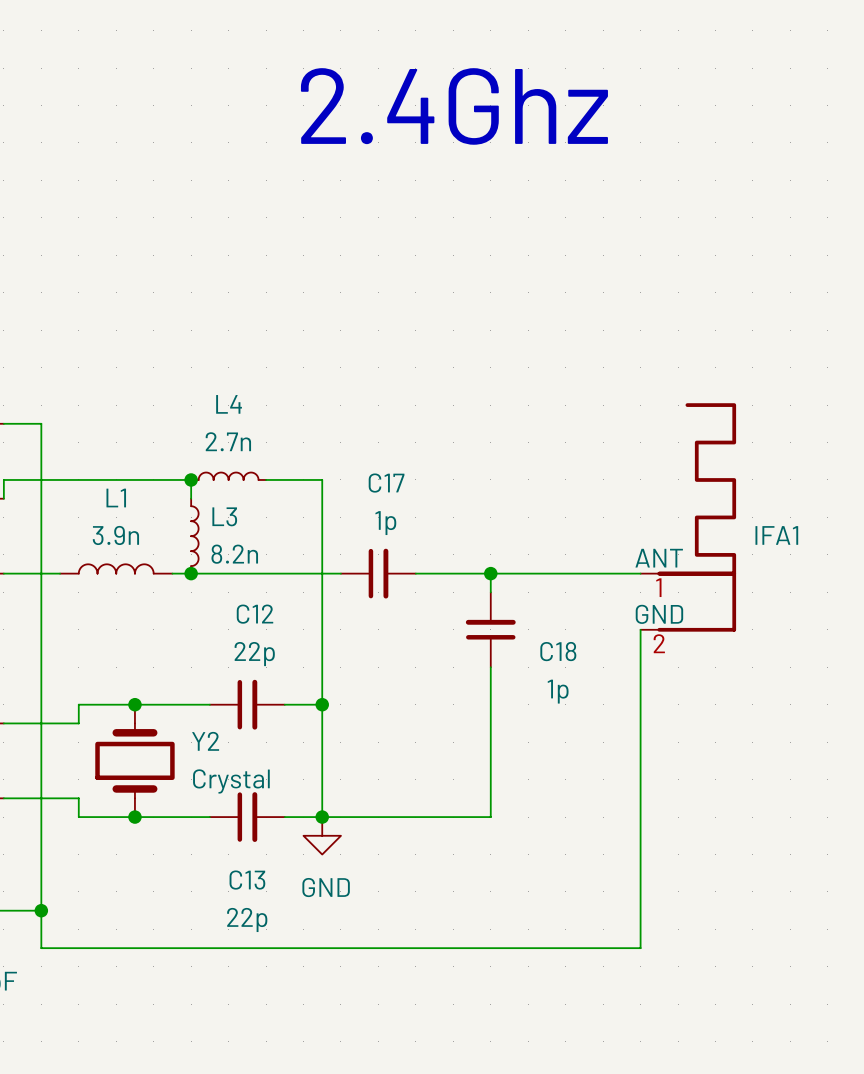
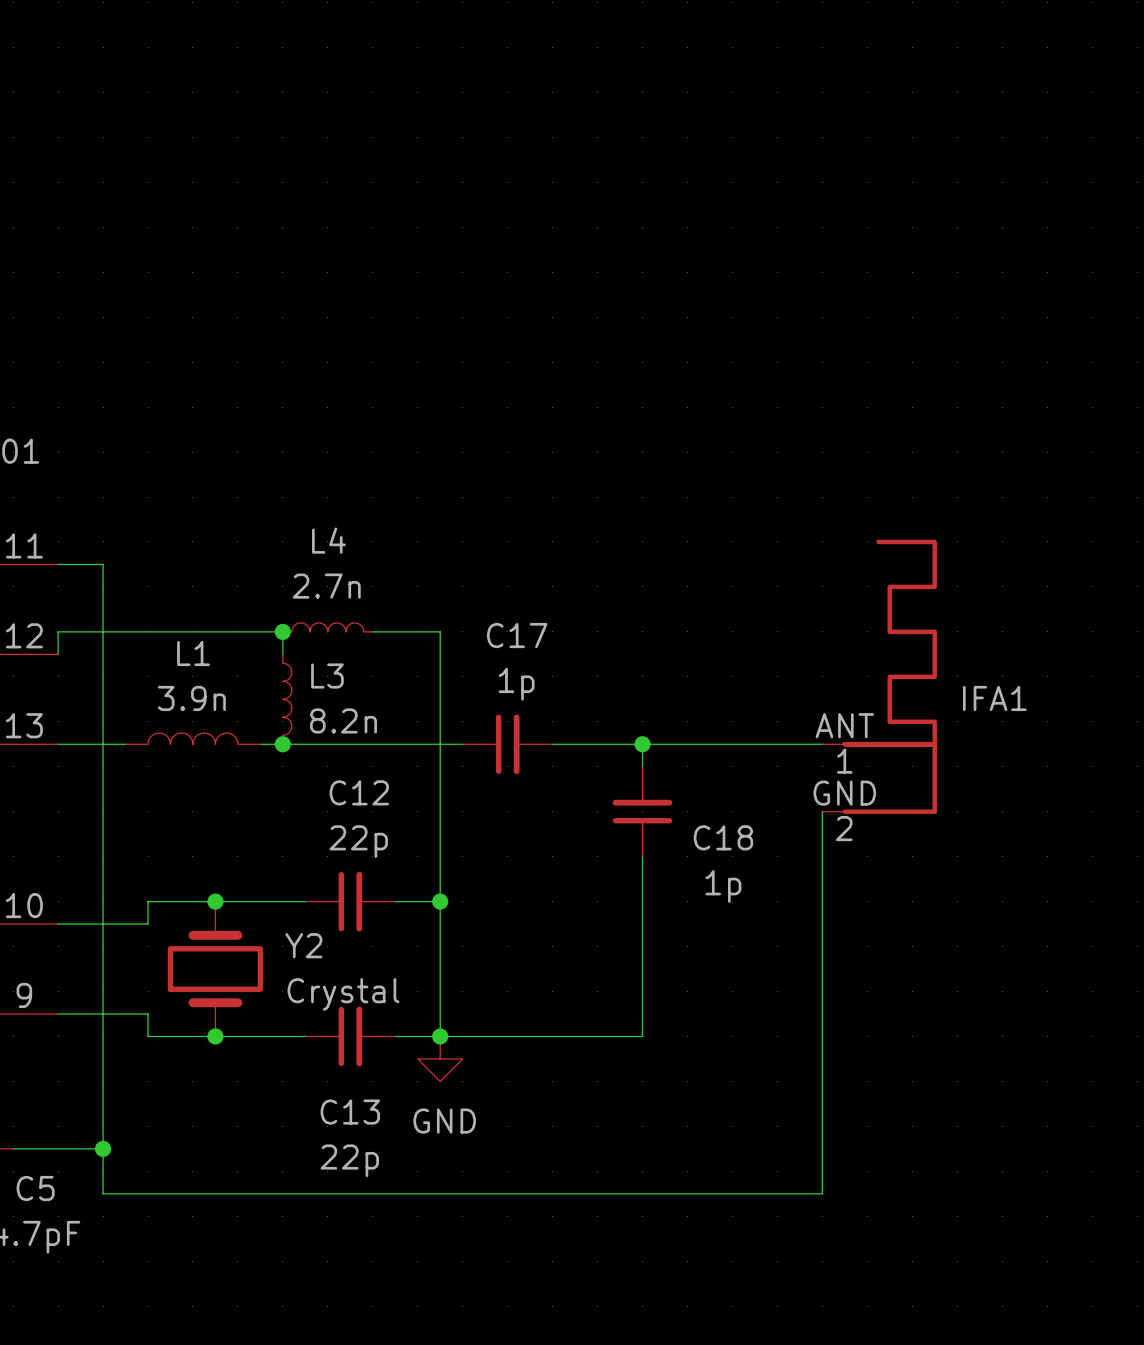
text: 2.4Ghz (454, 106) -> none

